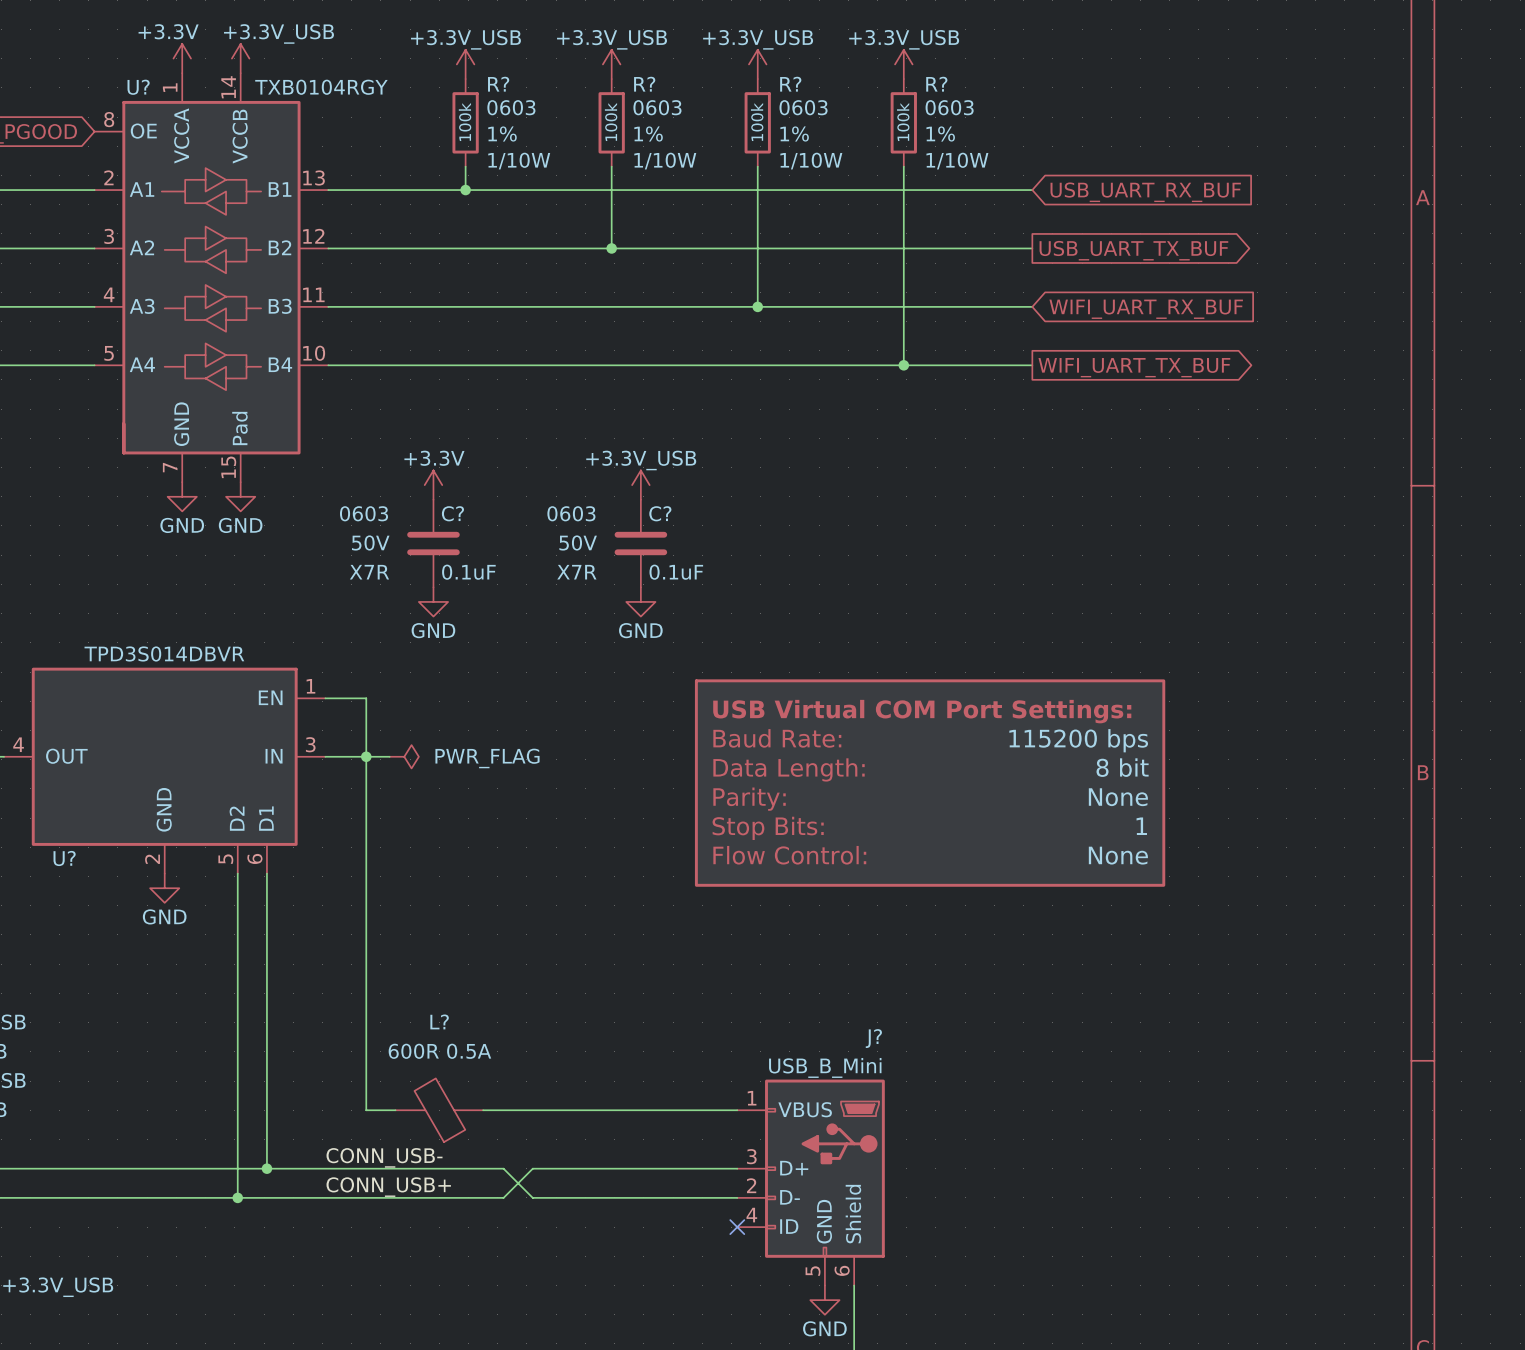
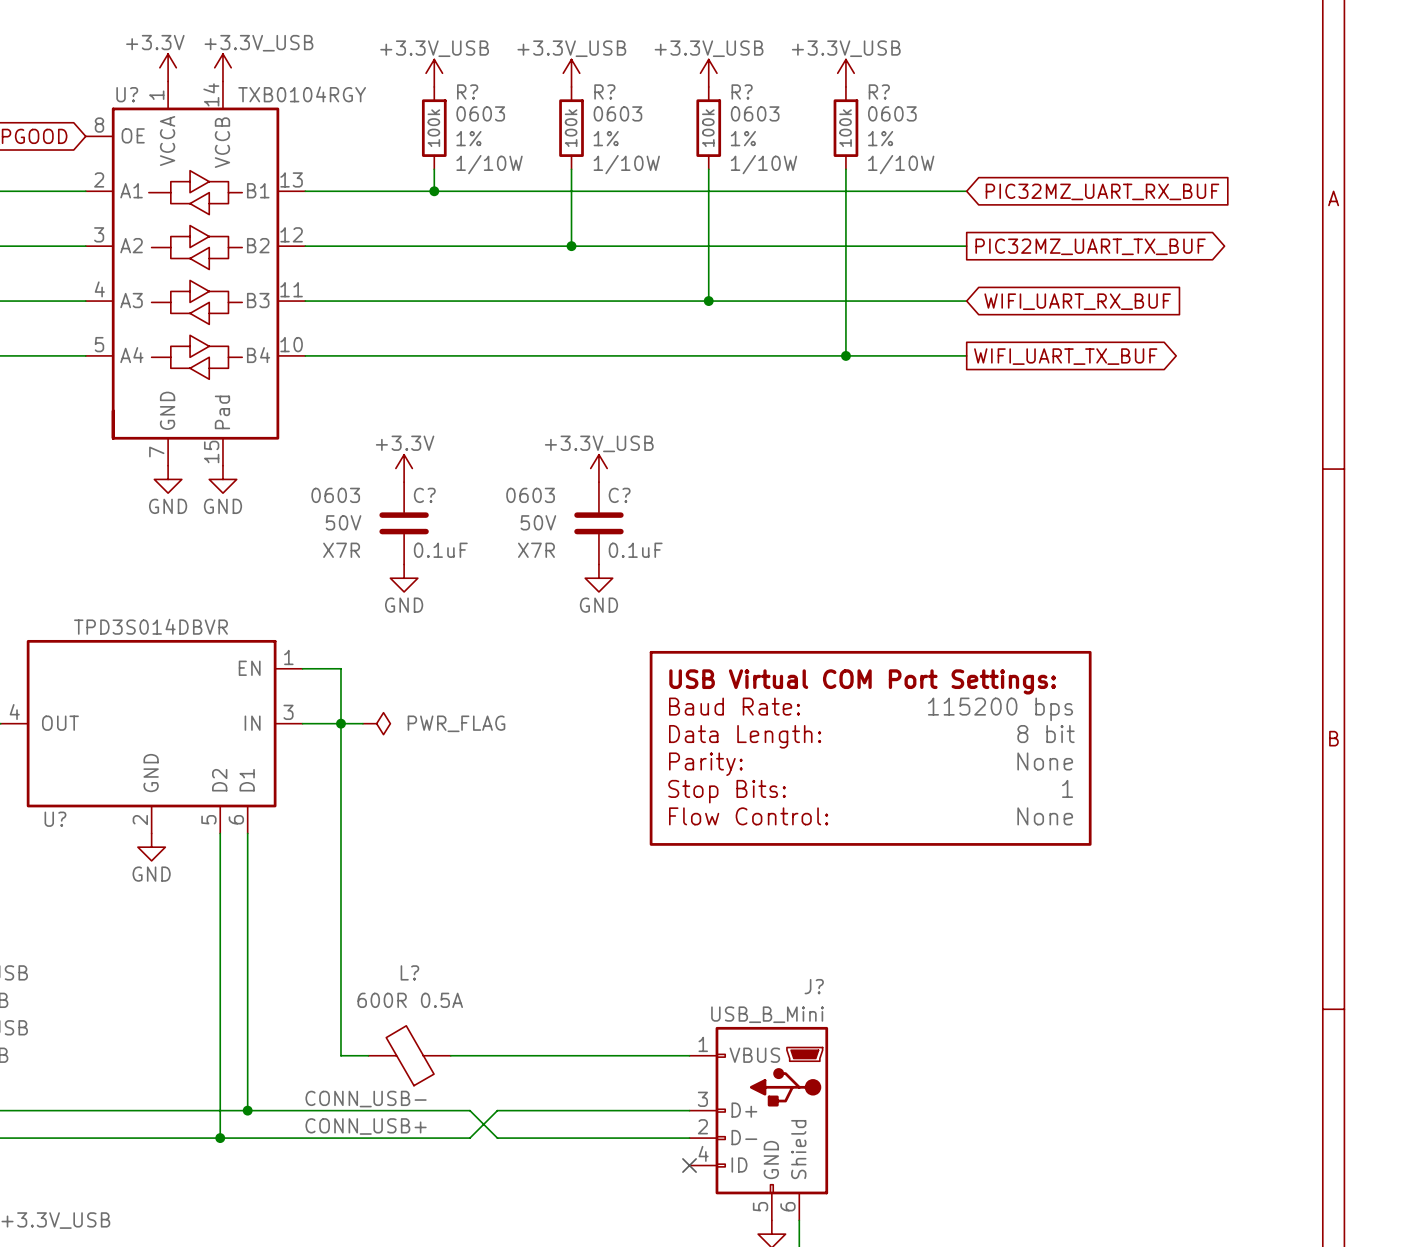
global label: USB_UART_RX_BUF (1145, 192) -> PIC32MZ_UART_RX_BUF (1102, 191)
global label: USB_UART_TX_BUF (1133, 250) -> PIC32MZ_UART_TX_BUF (1090, 246)

